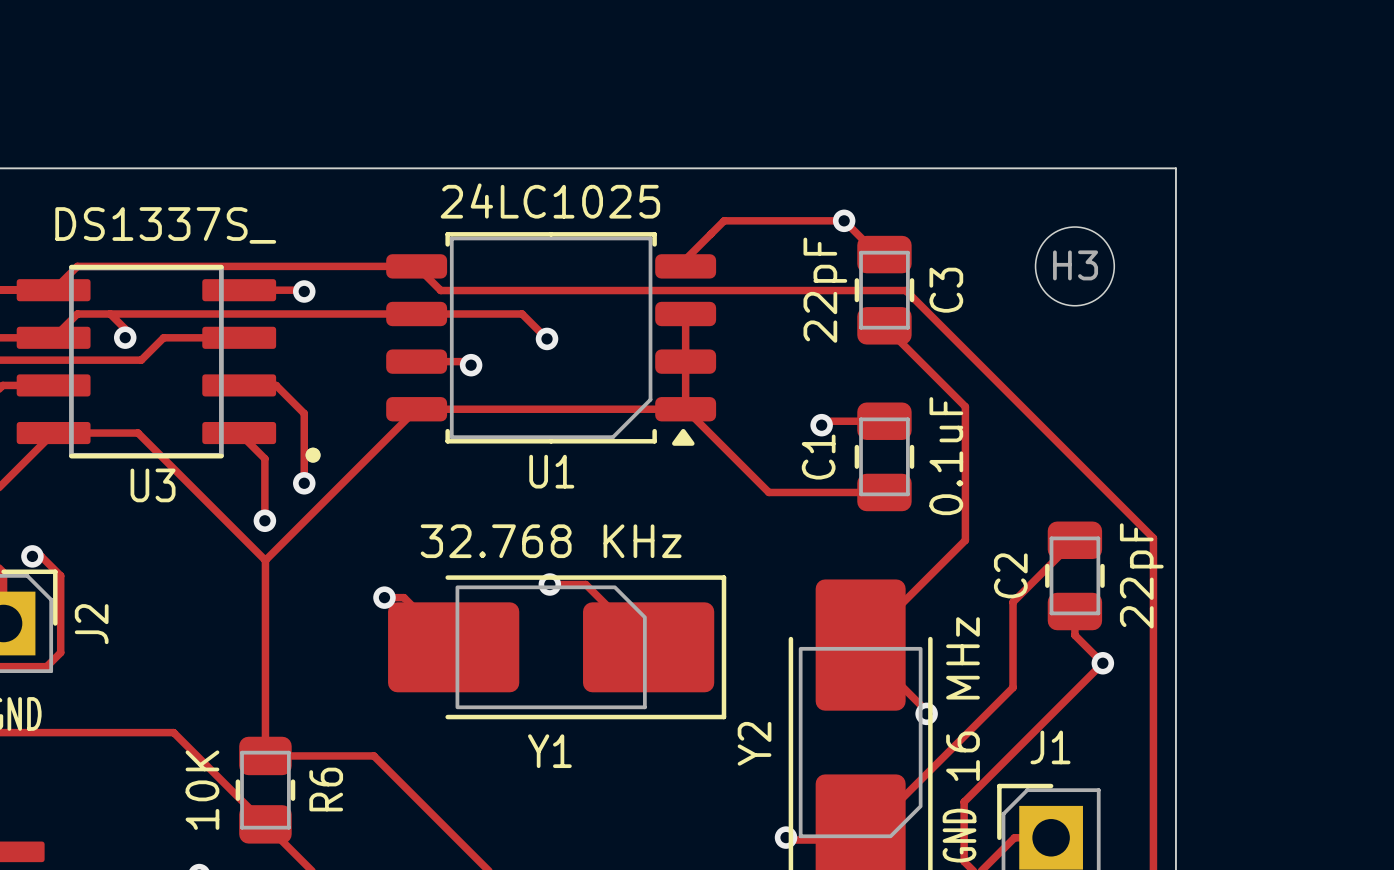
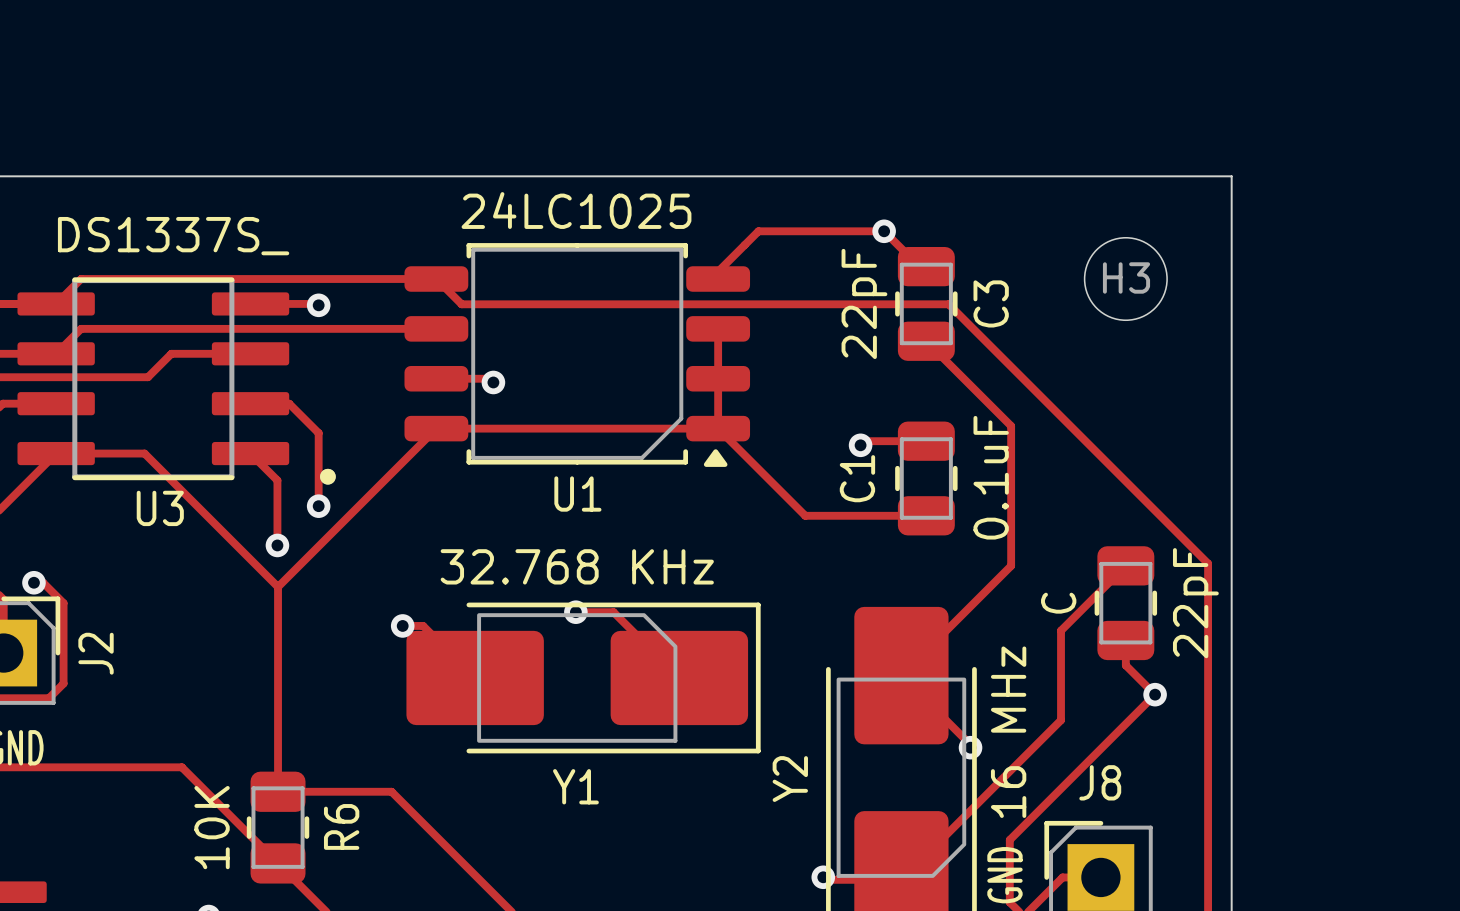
track: (110, 314) (125, 329) (125, 337) -> none
track: (416, 314) (522, 314) (547, 338) -> none
via: (125, 337) -> none
via: (547, 338) -> none
C2 name: C2 (1010, 575) -> C (1058, 603)
J1 name: J1 (1050, 747) -> J8 (1100, 782)

